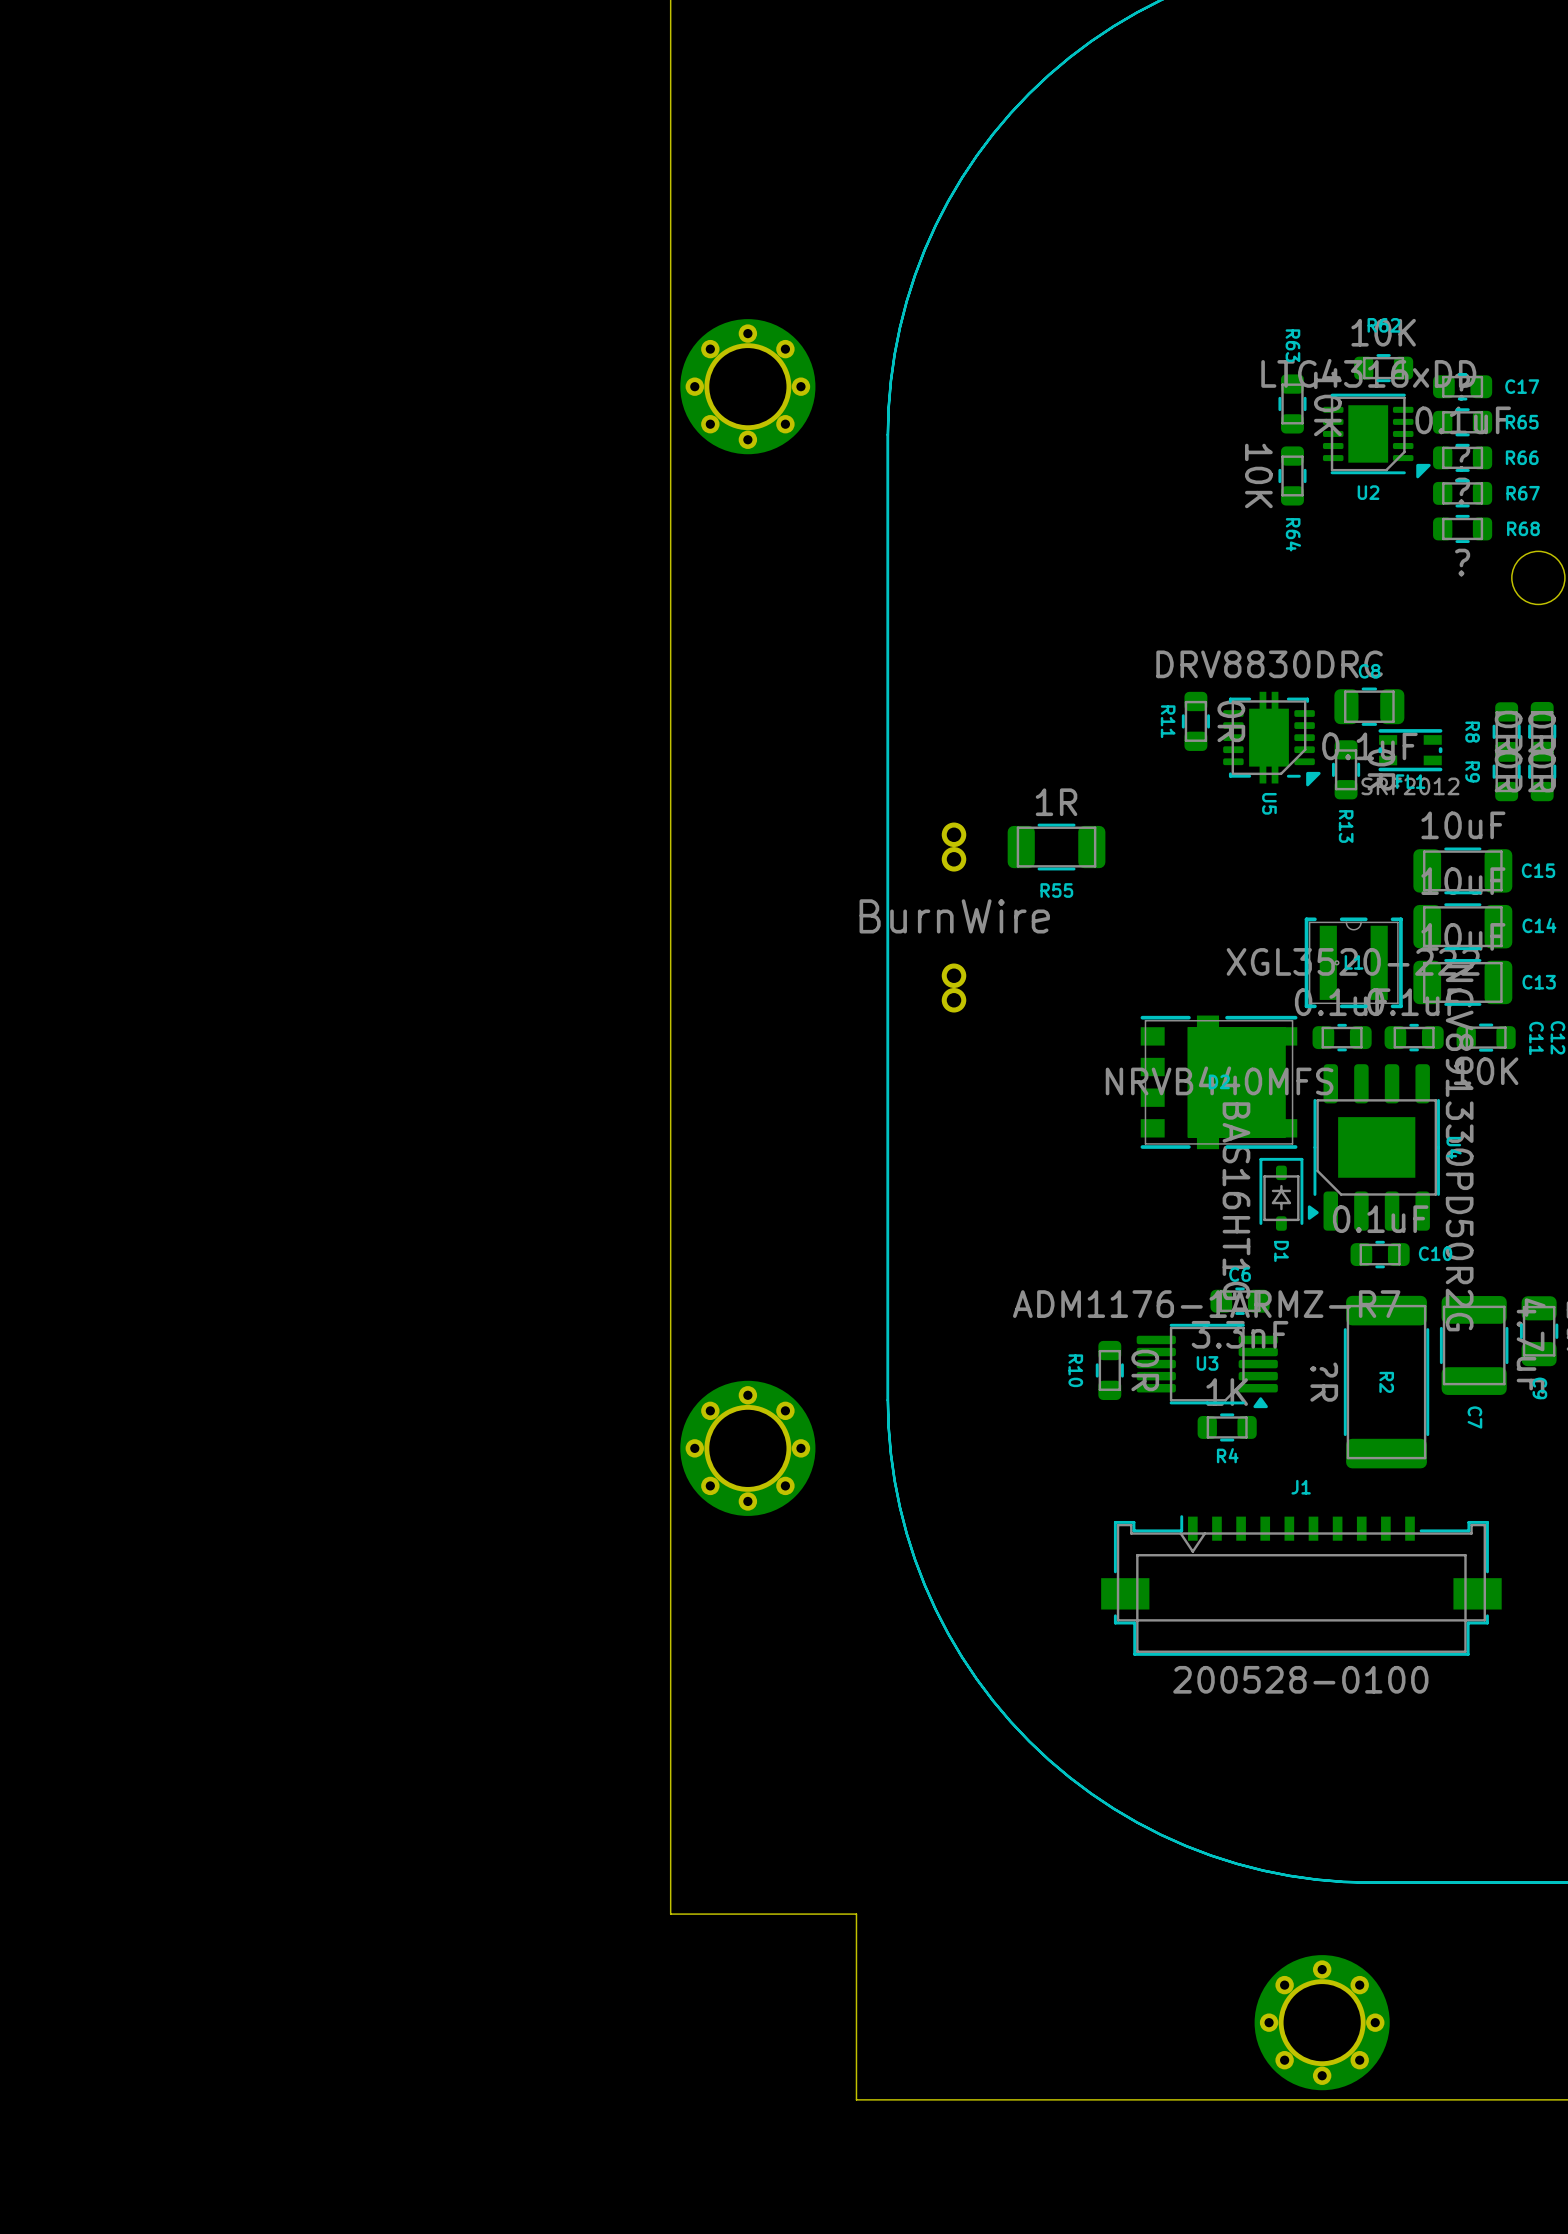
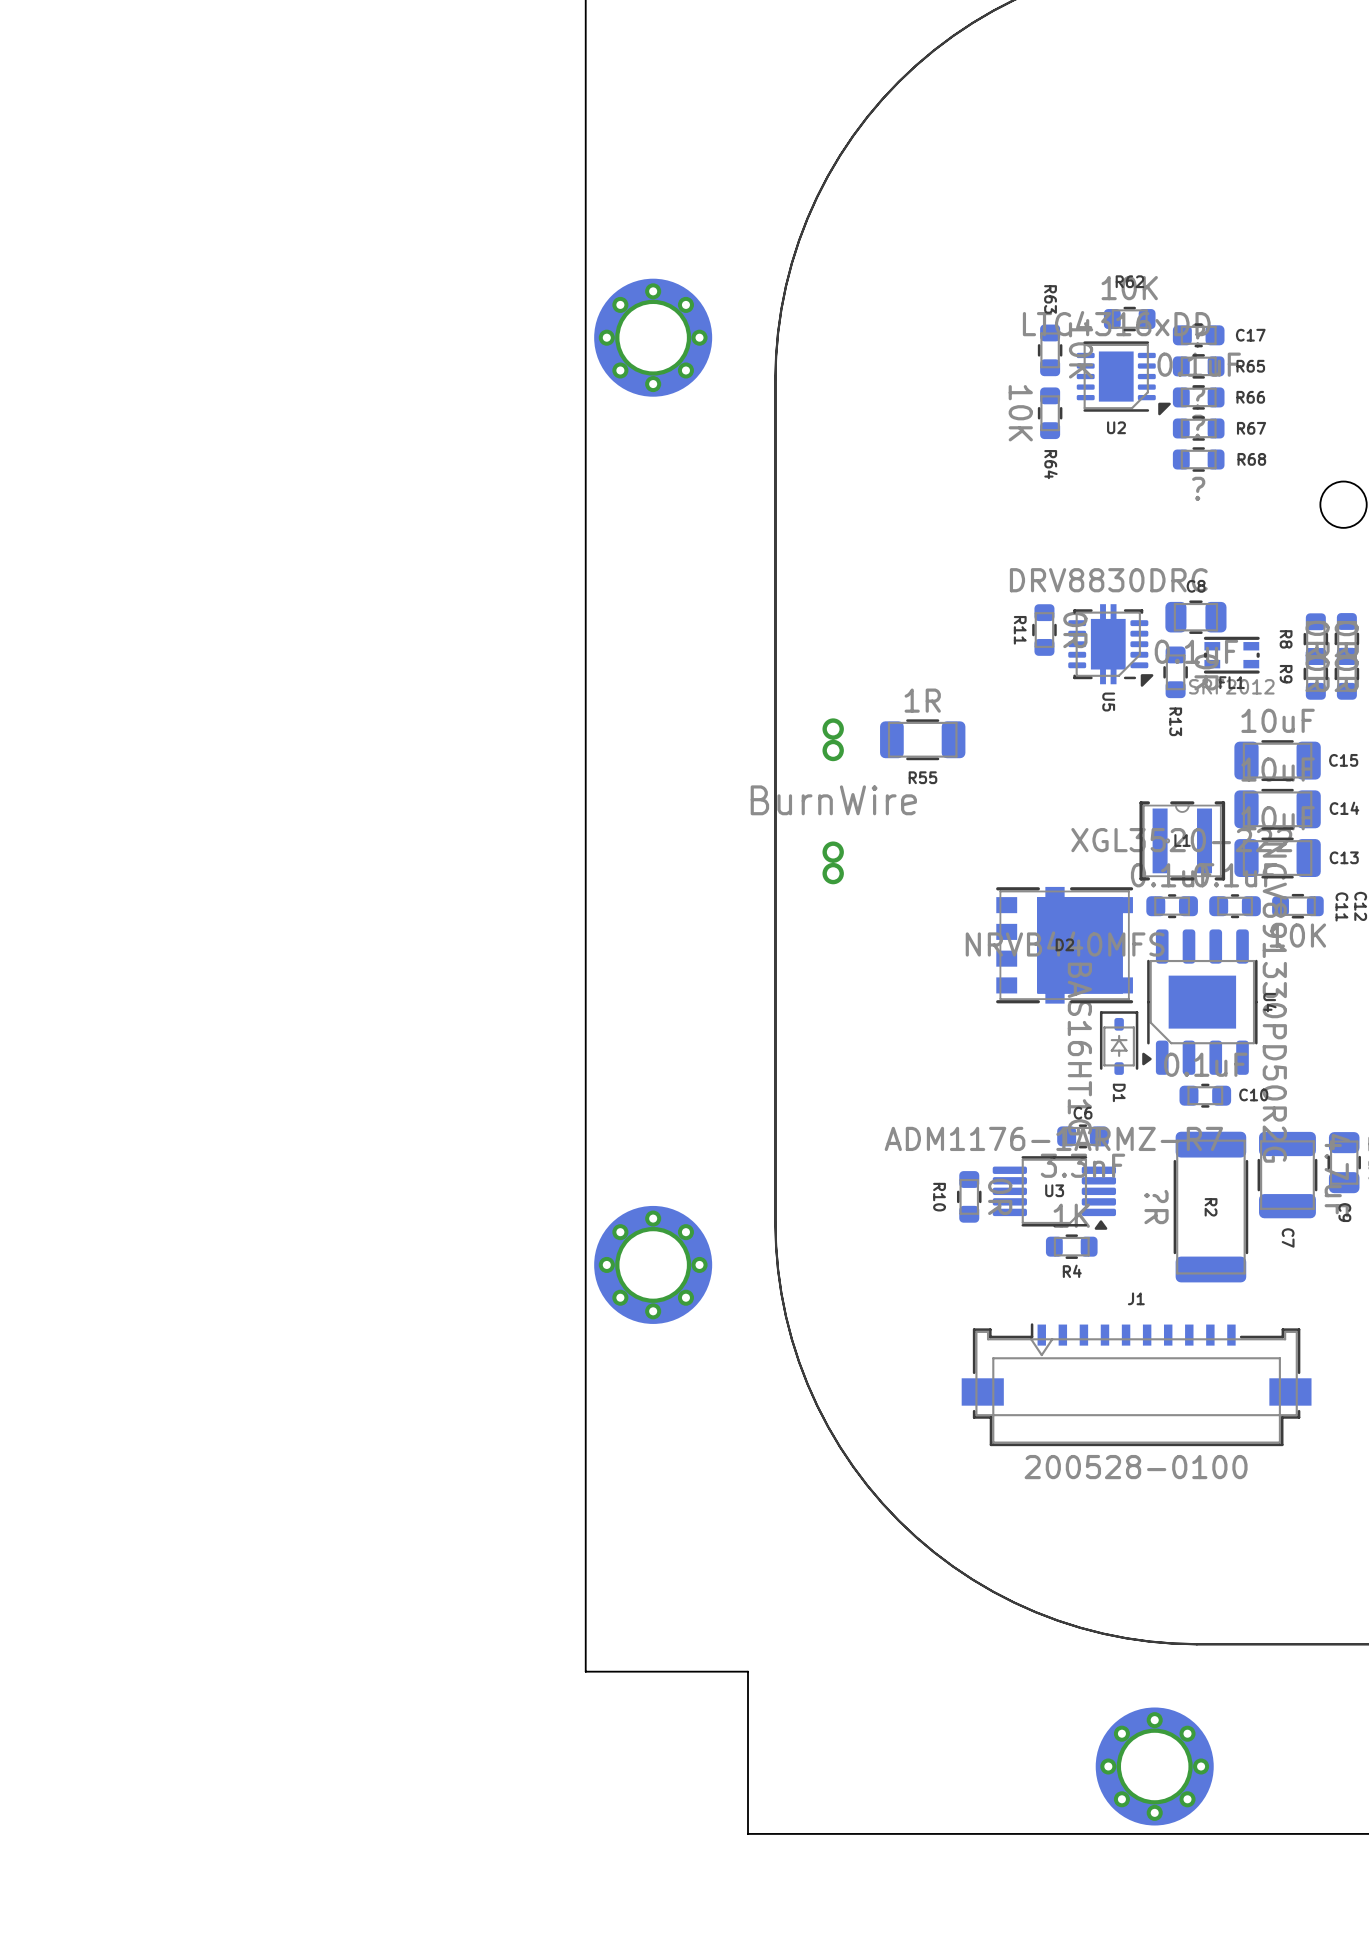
R62 position: (1383, 368) -> (1129, 319)
C17 position: (1462, 386) -> (1198, 335)
R63 position: (1292, 403) -> (1050, 350)
R65 position: (1462, 422) -> (1198, 366)
U2 position: (1376, 436) -> (1123, 378)
R66 position: (1462, 457) -> (1198, 397)
R64 position: (1292, 475) -> (1050, 413)
R67 position: (1462, 493) -> (1198, 428)
R68 position: (1462, 528) -> (1198, 459)

